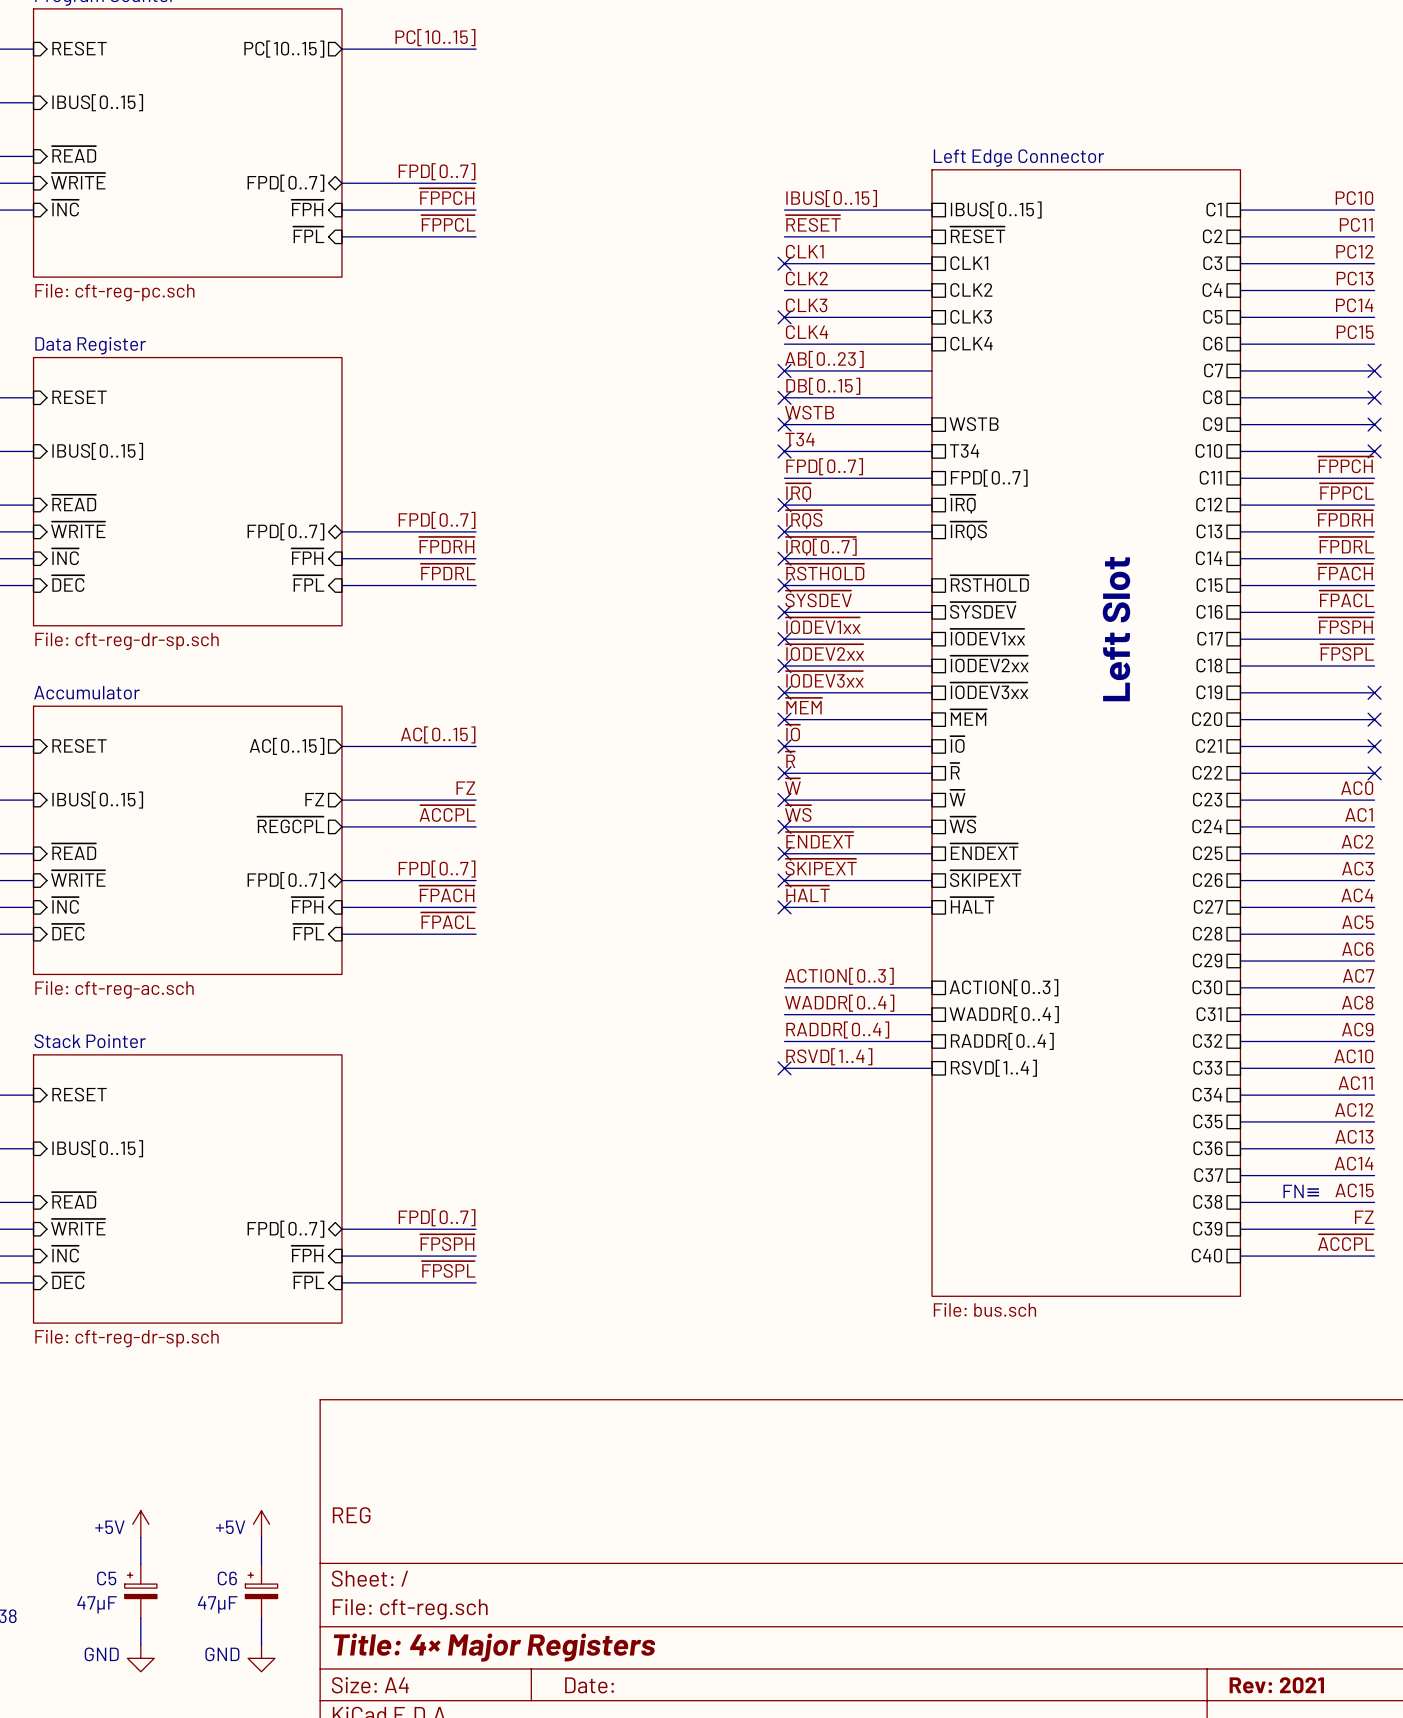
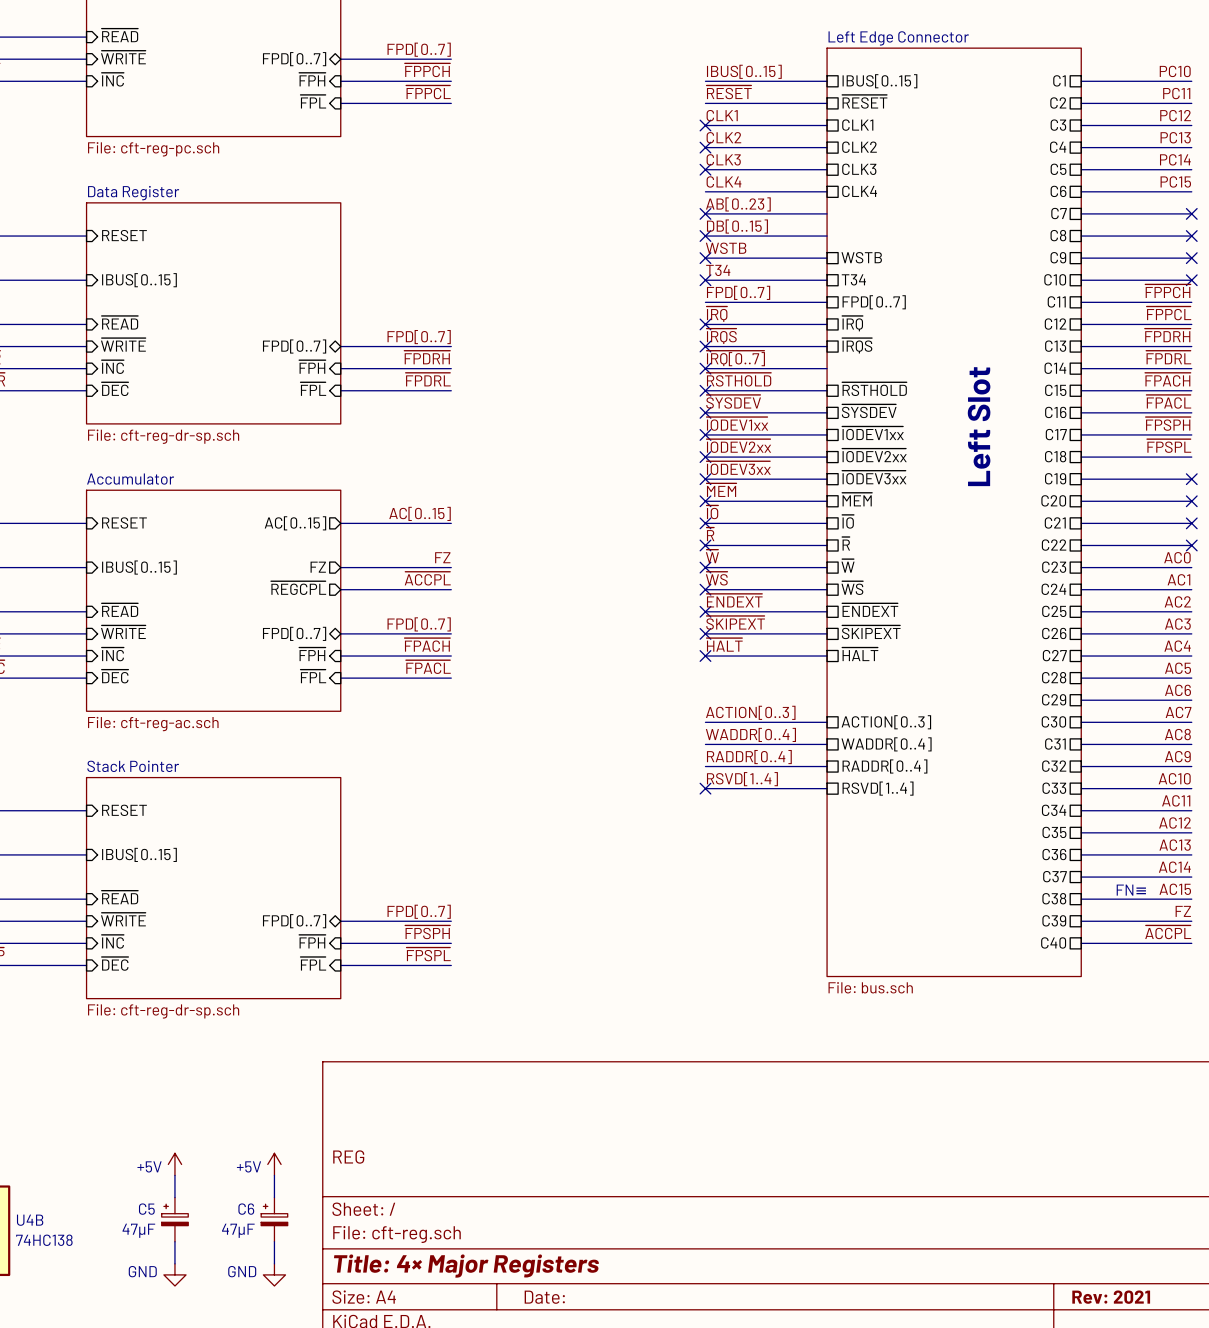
no-connect mark: none -> (705, 147)

